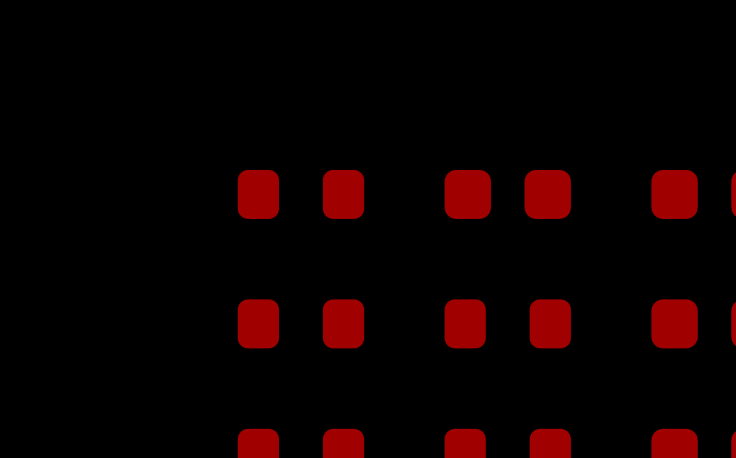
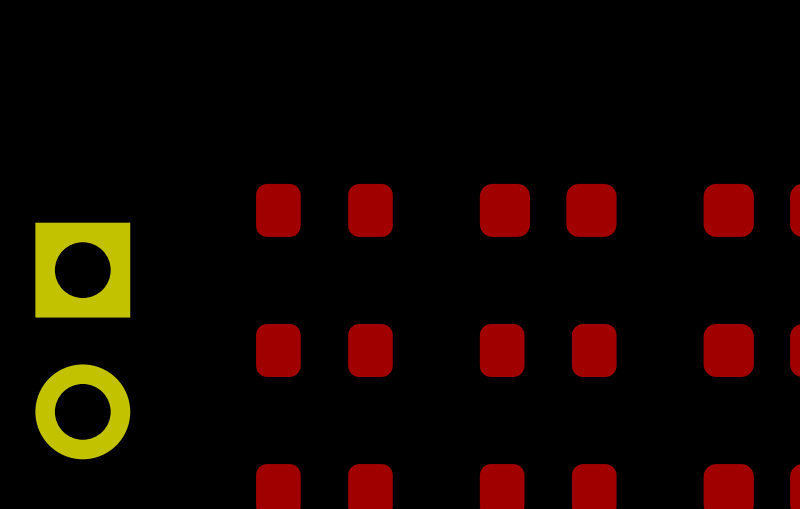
part: none -> (82, 341)

